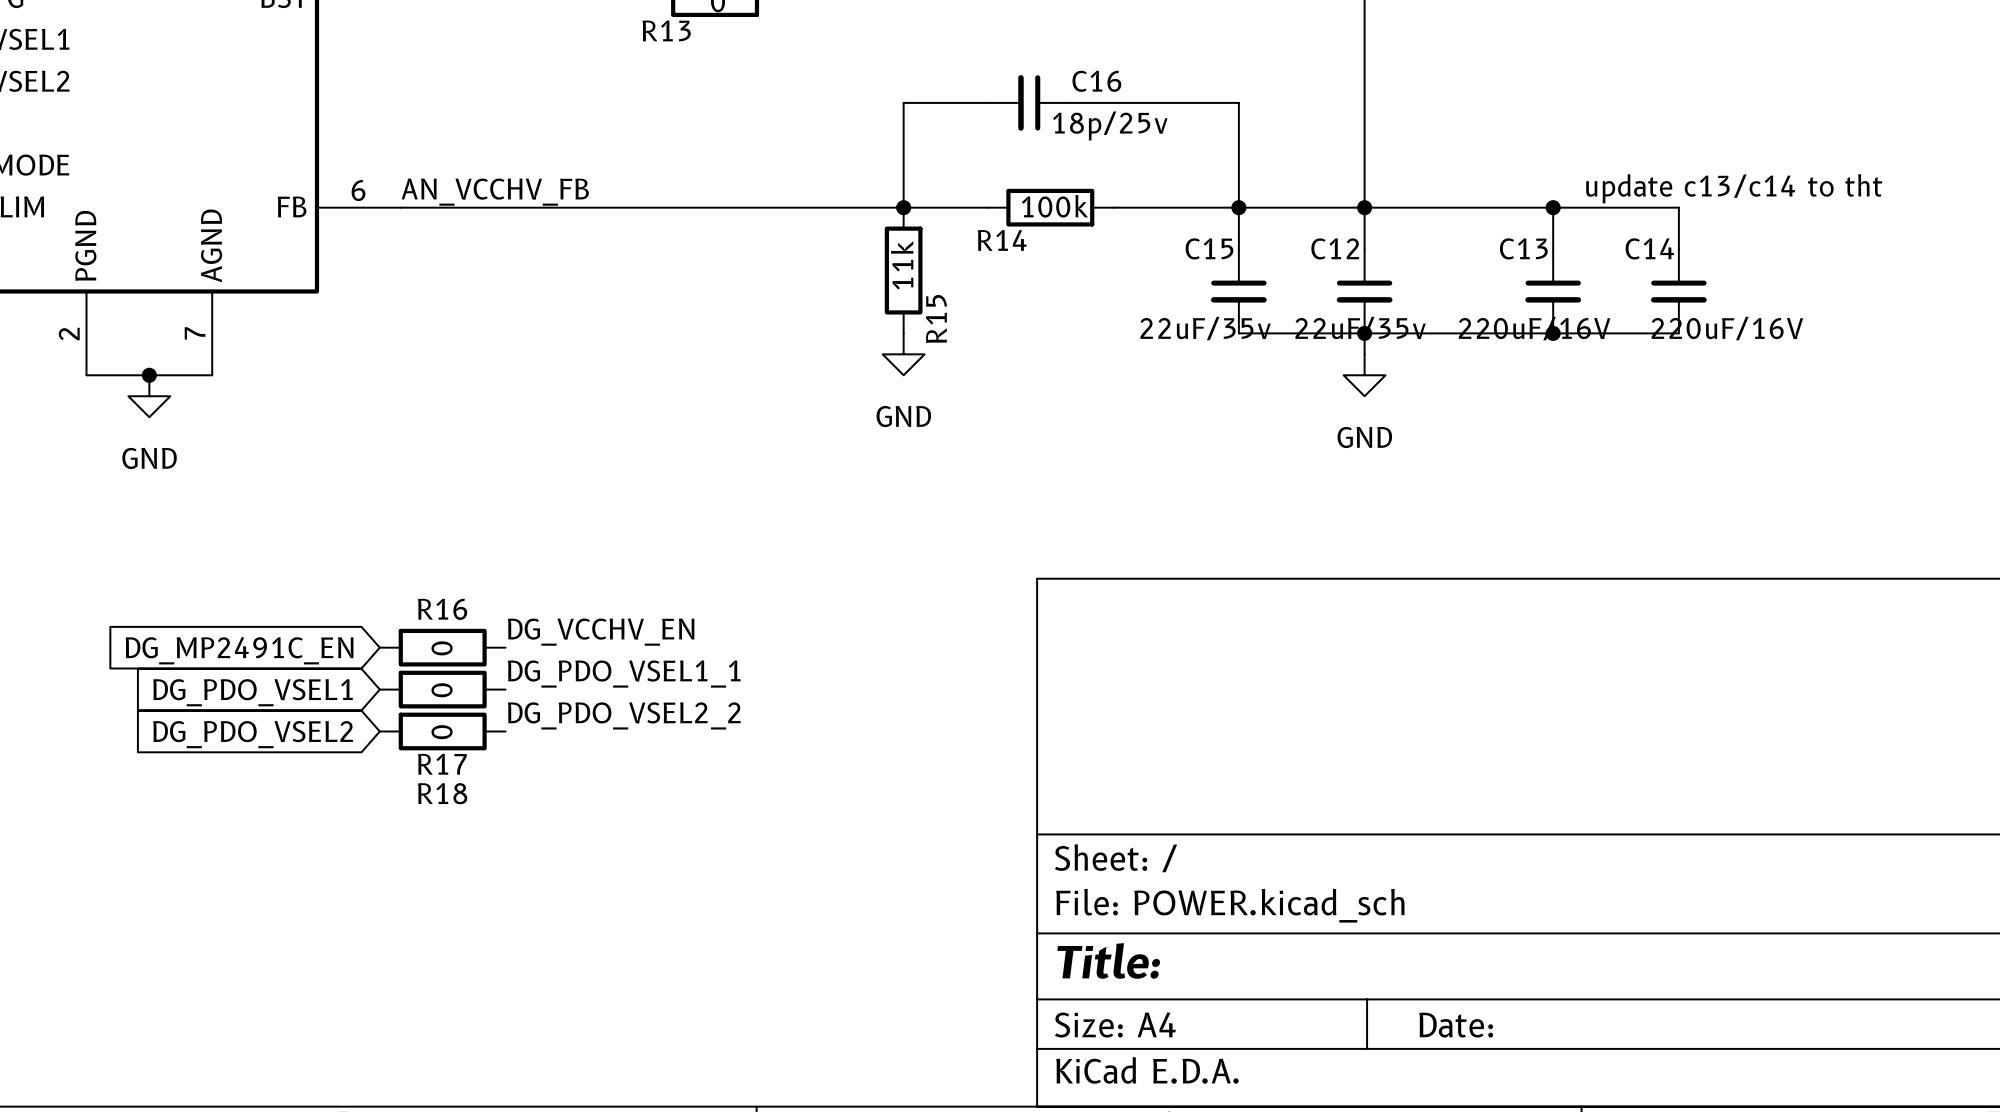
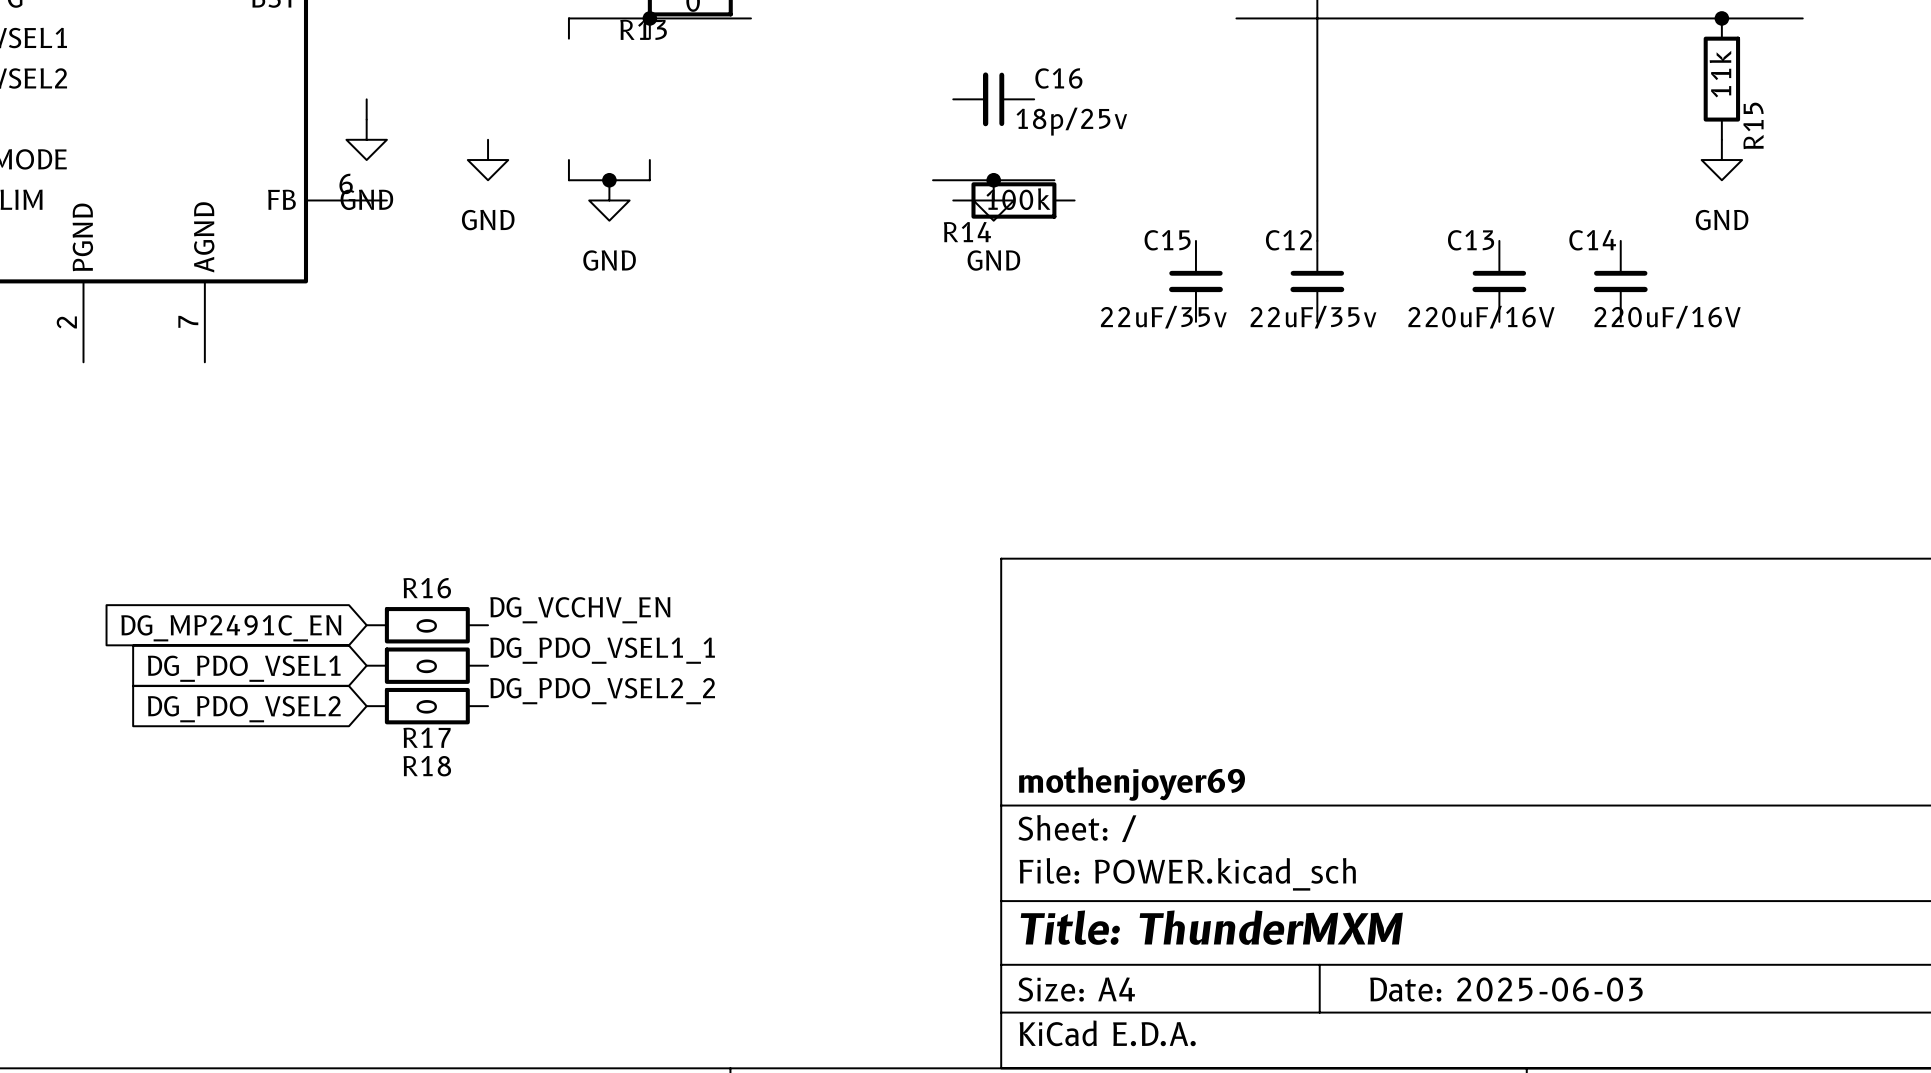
wire: none -> (649, 18) (649, 38)
junction: none -> (649, 18)
wire: none -> (750, 18) (568, 18) (568, 38)
wire: none -> (1236, 18) (1802, 18)
junction: none -> (1721, 18)
wire: none -> (366, 99) (366, 119)
wire: (987, 102) (903, 102) (903, 207) -> none
wire: (1071, 102) (1238, 102) (1238, 249) -> none
power symbol: none -> GND (366, 139)
power symbol: none -> GND (488, 160)
wire: none -> (568, 160) (568, 180) (649, 180) (649, 160)
power symbol: none -> GND (1721, 160)
junction: none -> (609, 180)
wire: none -> (933, 180) (1054, 180)
junction: none -> (993, 180)
text: update c13/c14 to tht (1734, 188) -> none
label: AN_VCCHV_FB (495, 192) -> none
wire: (400, 207) (987, 207) -> none
power symbol: none -> GND (609, 200)
junction: (903, 207) -> none
power symbol: none -> GND (993, 200)
wire: (1113, 207) (1678, 207) (1678, 249) -> none
junction: (1238, 207) -> none
junction: (1364, 207) -> none
wire: (1553, 207) (1553, 249) -> none
junction: (1553, 207) -> none
R15 position: (903, 270) -> (1721, 79)
wire: (1238, 333) (1678, 333) -> none
wire: (1364, 333) (1364, 354) -> none
junction: (1364, 333) -> none
junction: (1553, 333) -> none
power symbol: GND (903, 354) -> none
wire: (86, 375) (212, 375) -> none
junction: (149, 375) -> none
power symbol: GND (1364, 375) -> none
power symbol: GND (149, 396) -> none
title block: none -> mothenjoyer69 (1132, 783)
title block: Title: (1108, 960) -> Title: ThunderMXM (1211, 927)
title block: Date: (1456, 1025) -> Date: 2025-06-03 (1506, 989)

